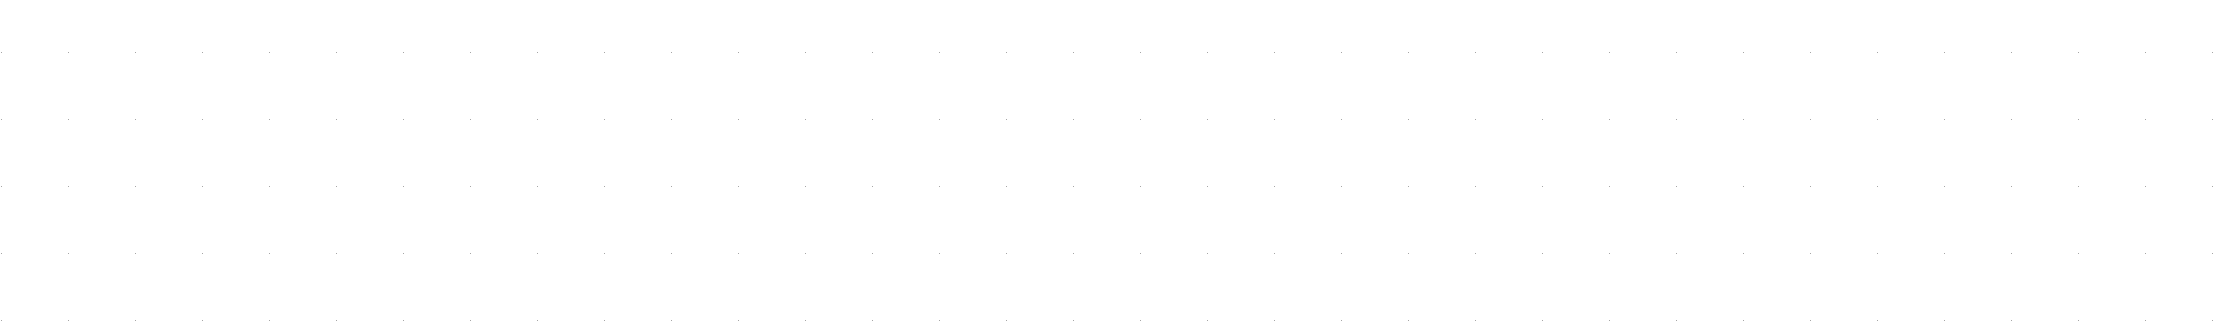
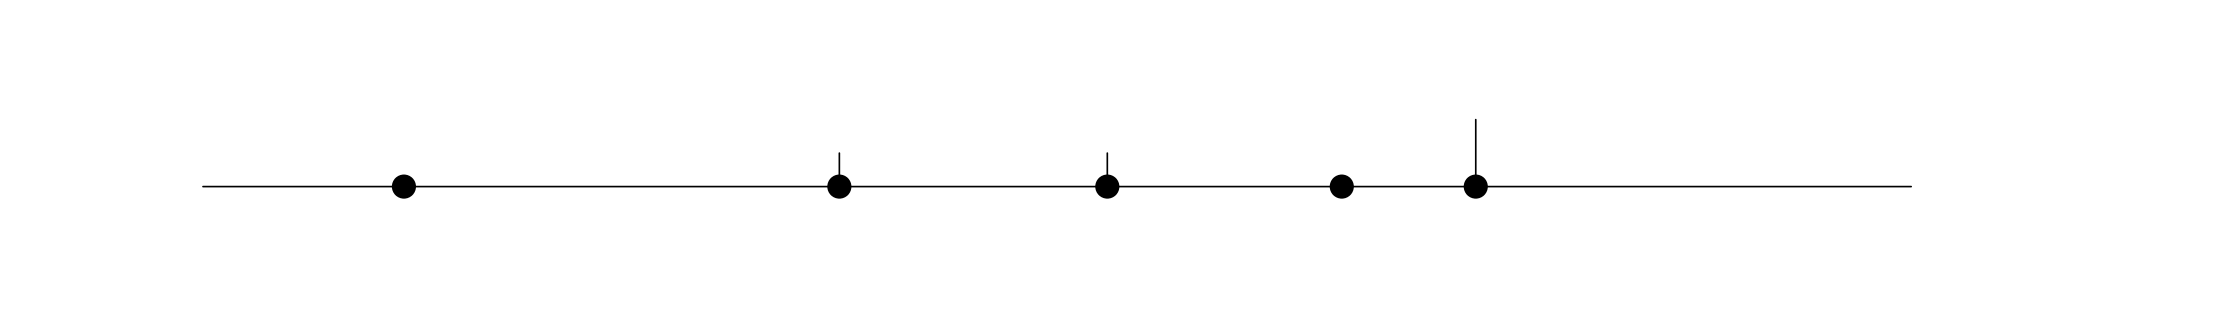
wire: none -> (1475, 119) (1475, 186)
wire: none -> (839, 153) (839, 186)
wire: none -> (1107, 153) (1107, 186)
wire: none -> (202, 186) (1911, 186)
junction: none -> (403, 186)
junction: none -> (839, 186)
junction: none -> (1107, 186)
junction: none -> (1341, 186)
junction: none -> (1475, 186)

